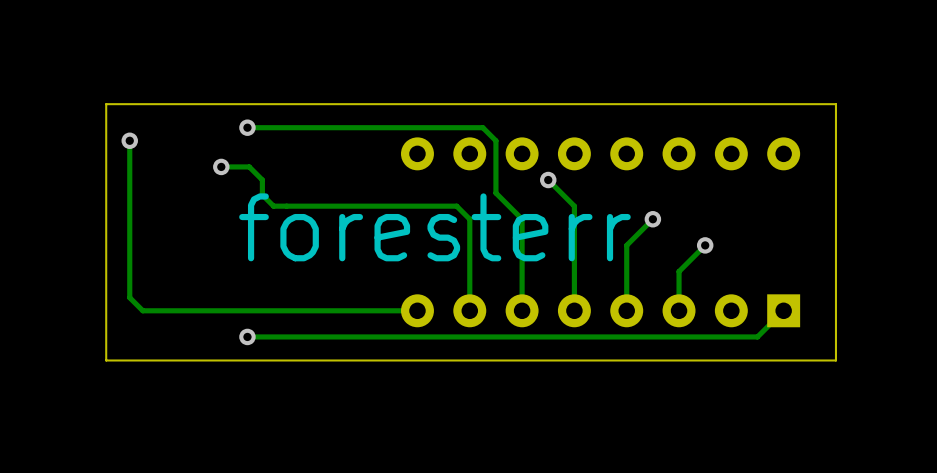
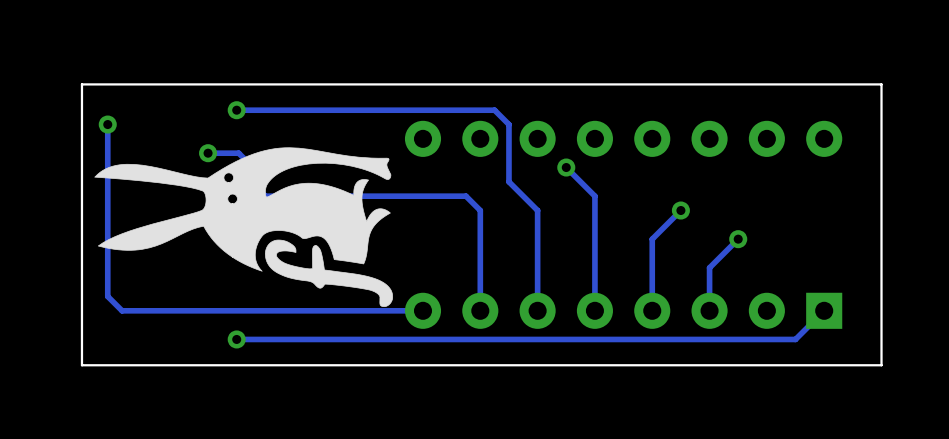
drawing: none -> [94, 147, 394, 308]
text: foresterr (434, 227) -> none

